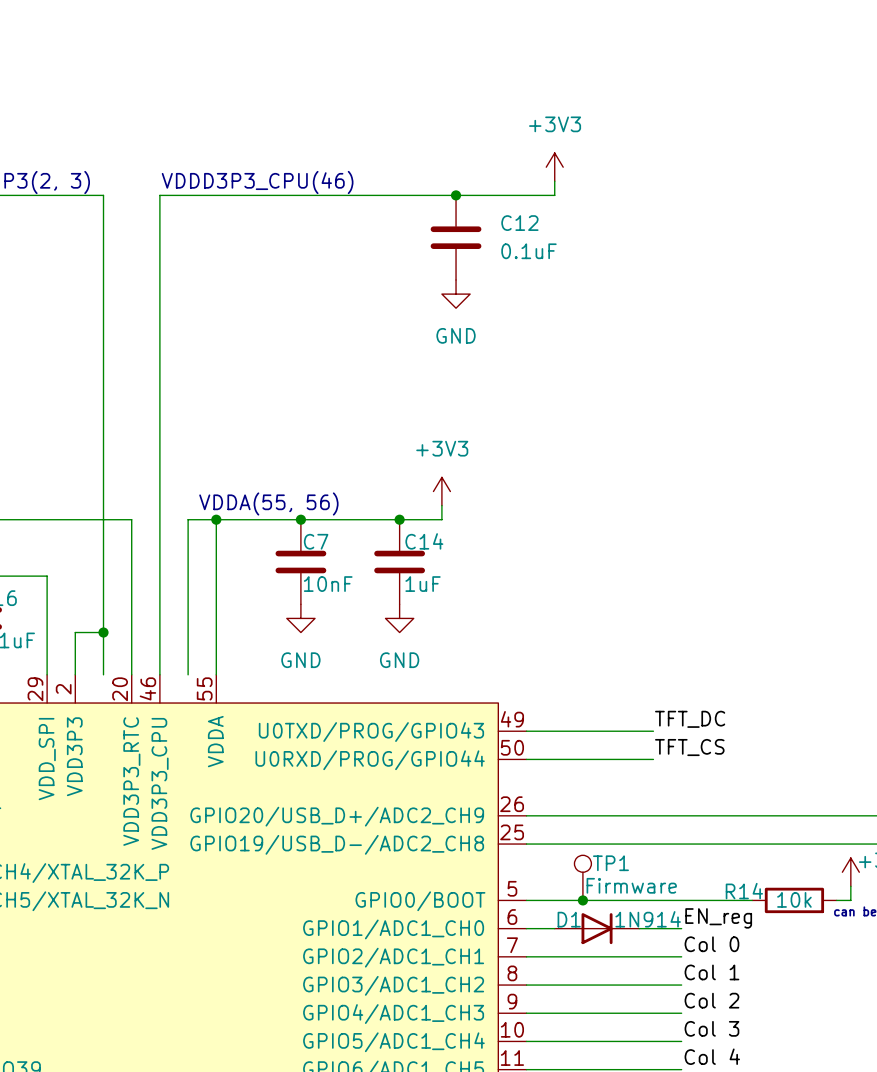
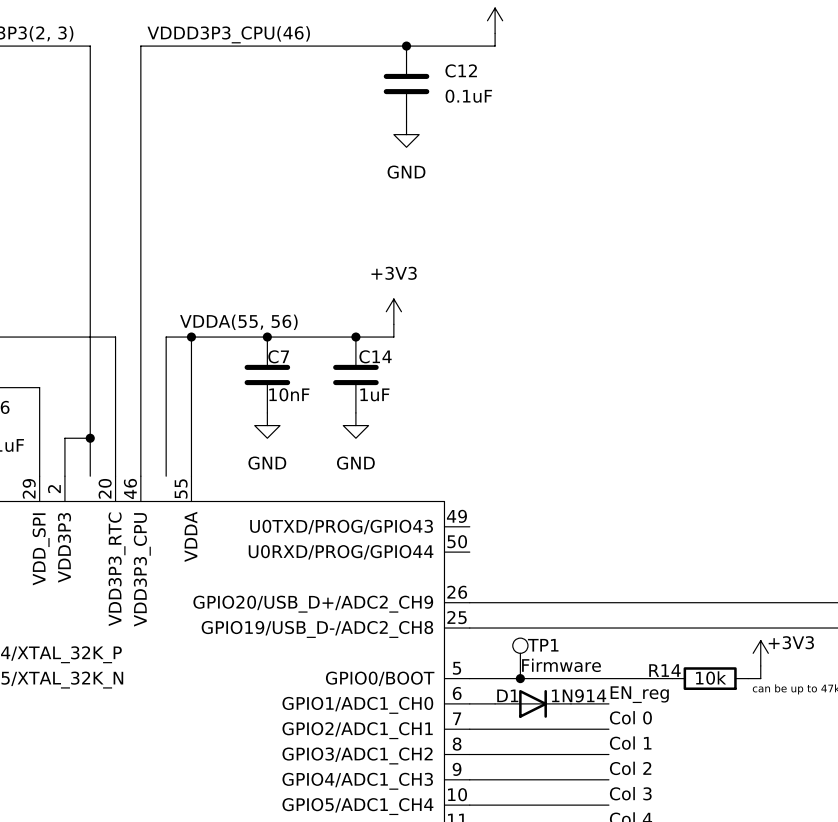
label: TFT_DC (690, 719) -> none
wire: (526, 731) (653, 731) -> none
label: TFT_CS (689, 747) -> none
wire: (526, 759) (653, 759) -> none

